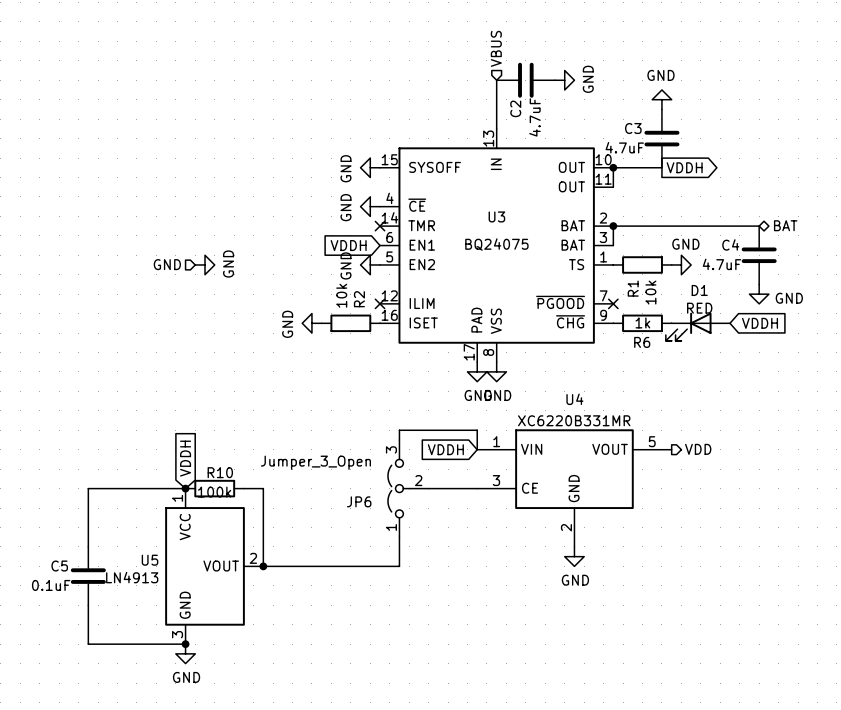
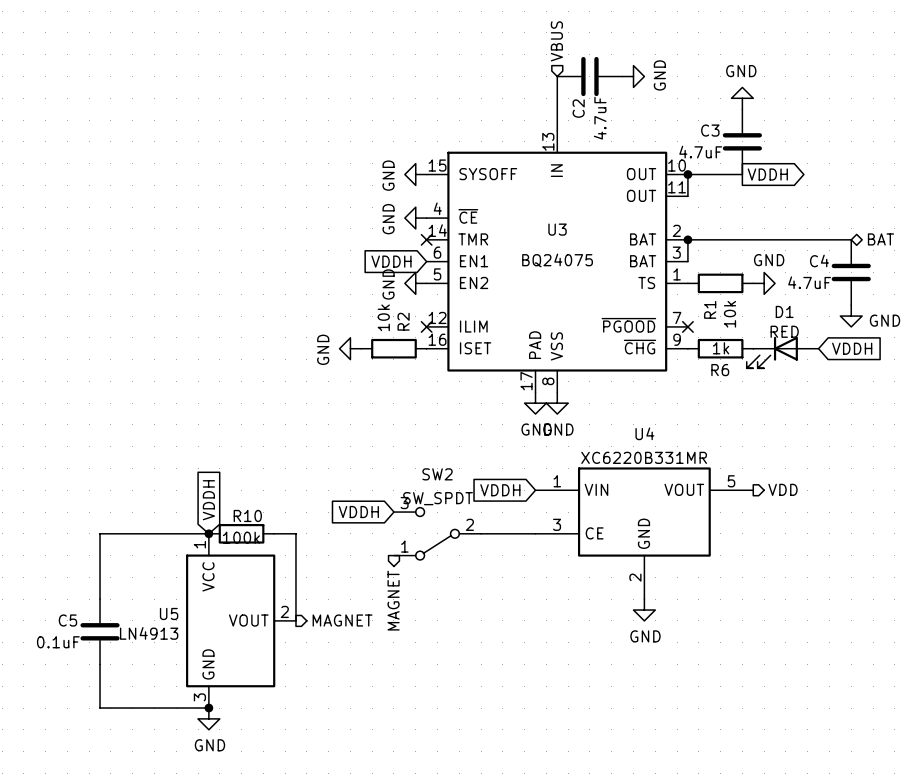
hierarchical label: GND (167, 264) -> none
power symbol: GND (205, 264) -> none
wire: (399, 439) (399, 430) (477, 430) (477, 449) -> none
global label: none -> VDDH (358, 512)
SW2: none -> SW_SPDT (437, 533)
JP6: Jumper_3_Open (408, 488) -> none
wire: (399, 537) (399, 566) (263, 566) -> none
hierarchical label: none -> MAGNET (393, 600)
junction: (263, 566) -> none
hierarchical label: none -> MAGNET (342, 620)

